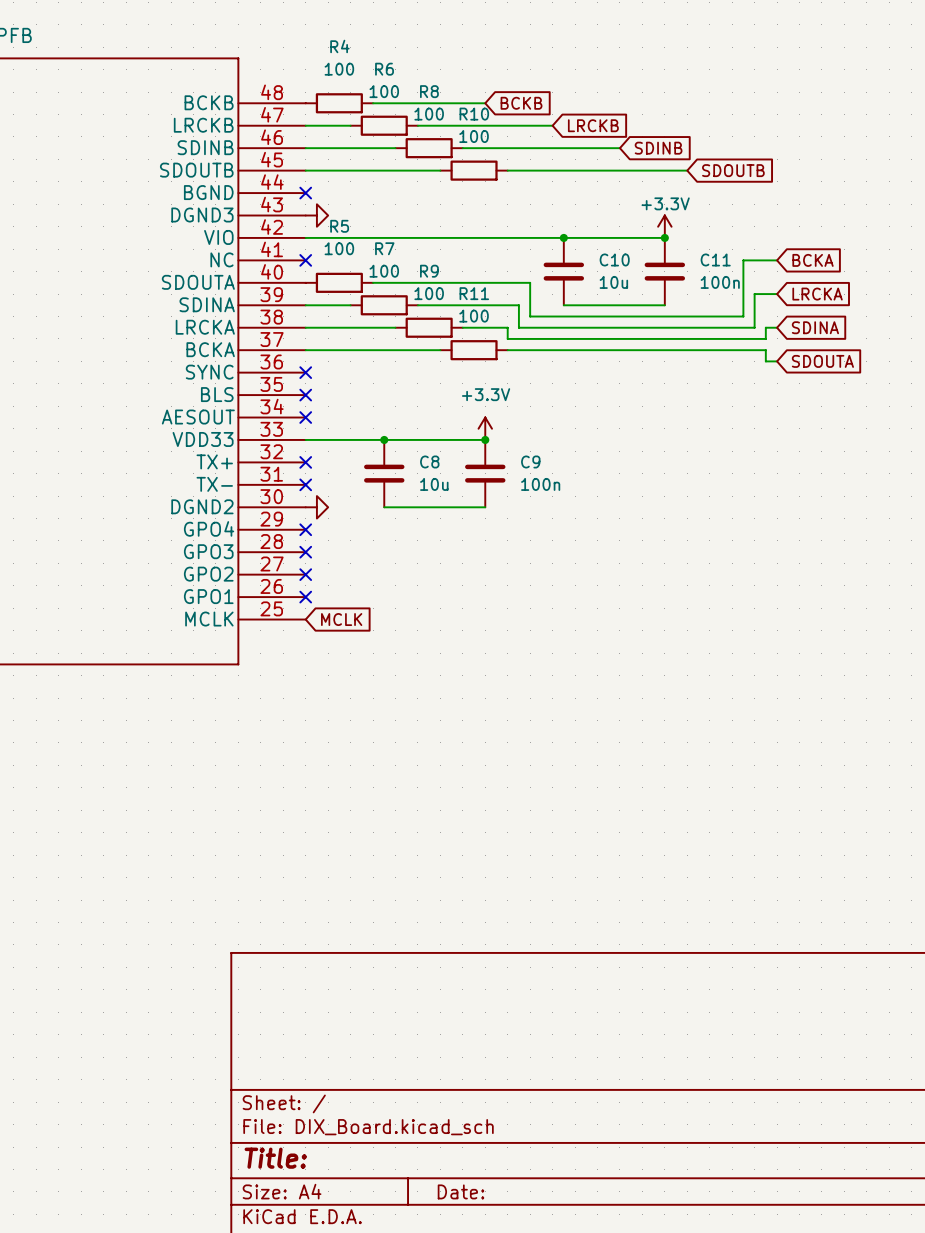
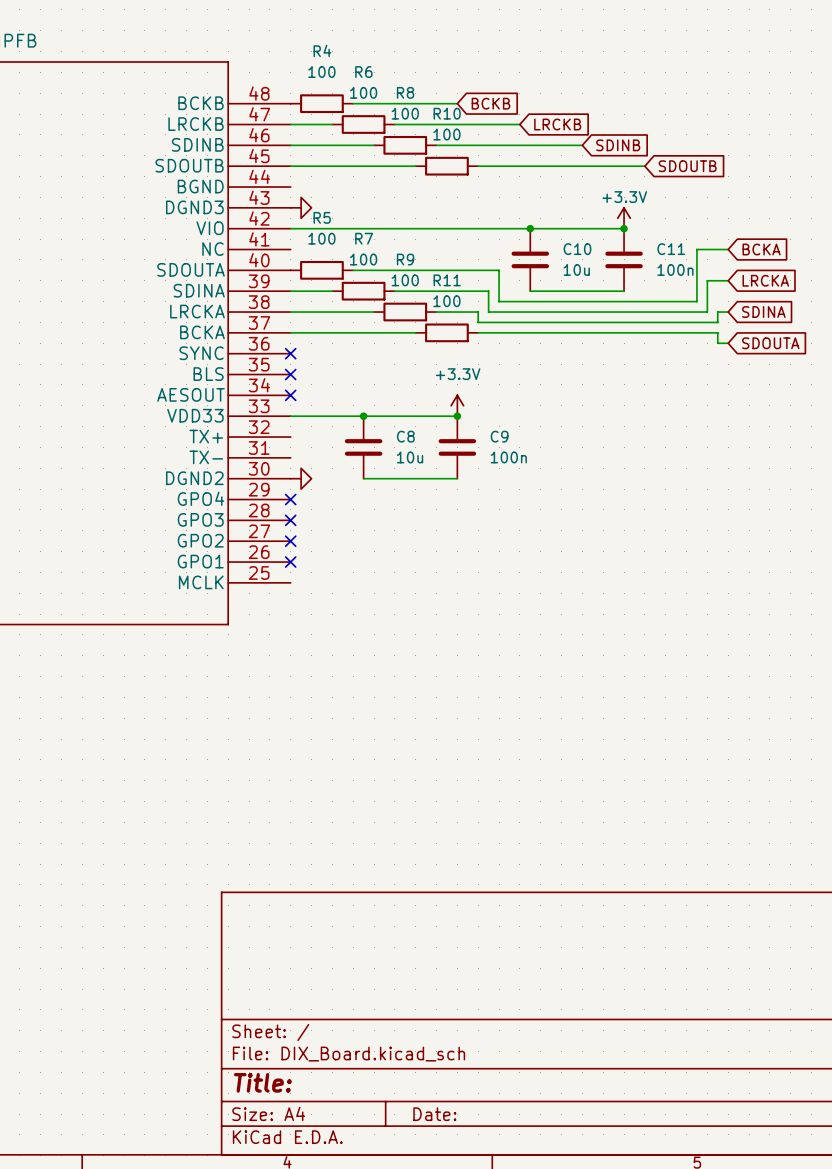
no-connect mark: (305, 193) -> none
no-connect mark: (305, 260) -> none
no-connect mark: (305, 462) -> none
no-connect mark: (305, 484) -> none
global label: MCLK (341, 619) -> none

